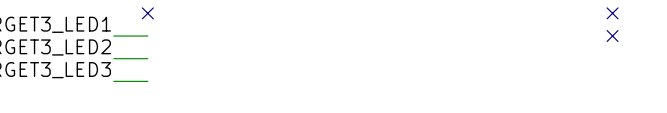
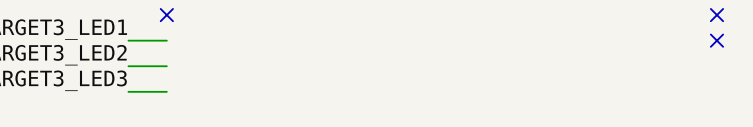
no-connect mark: (612, 13) -> none
no-connect mark: none -> (716, 15)
no-connect mark: (612, 36) -> none
no-connect mark: none -> (716, 40)

